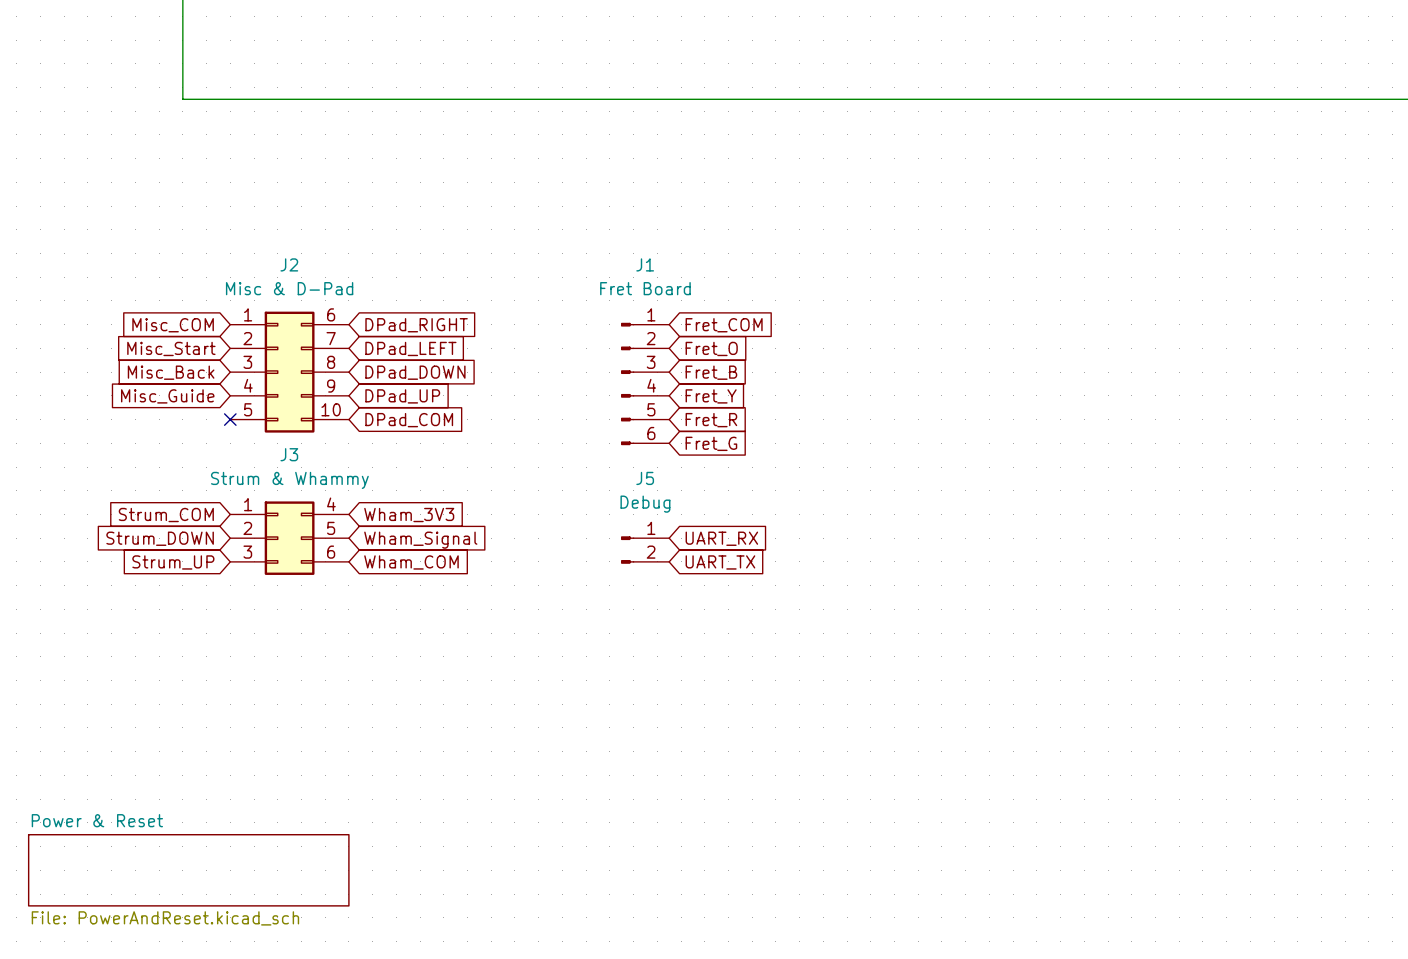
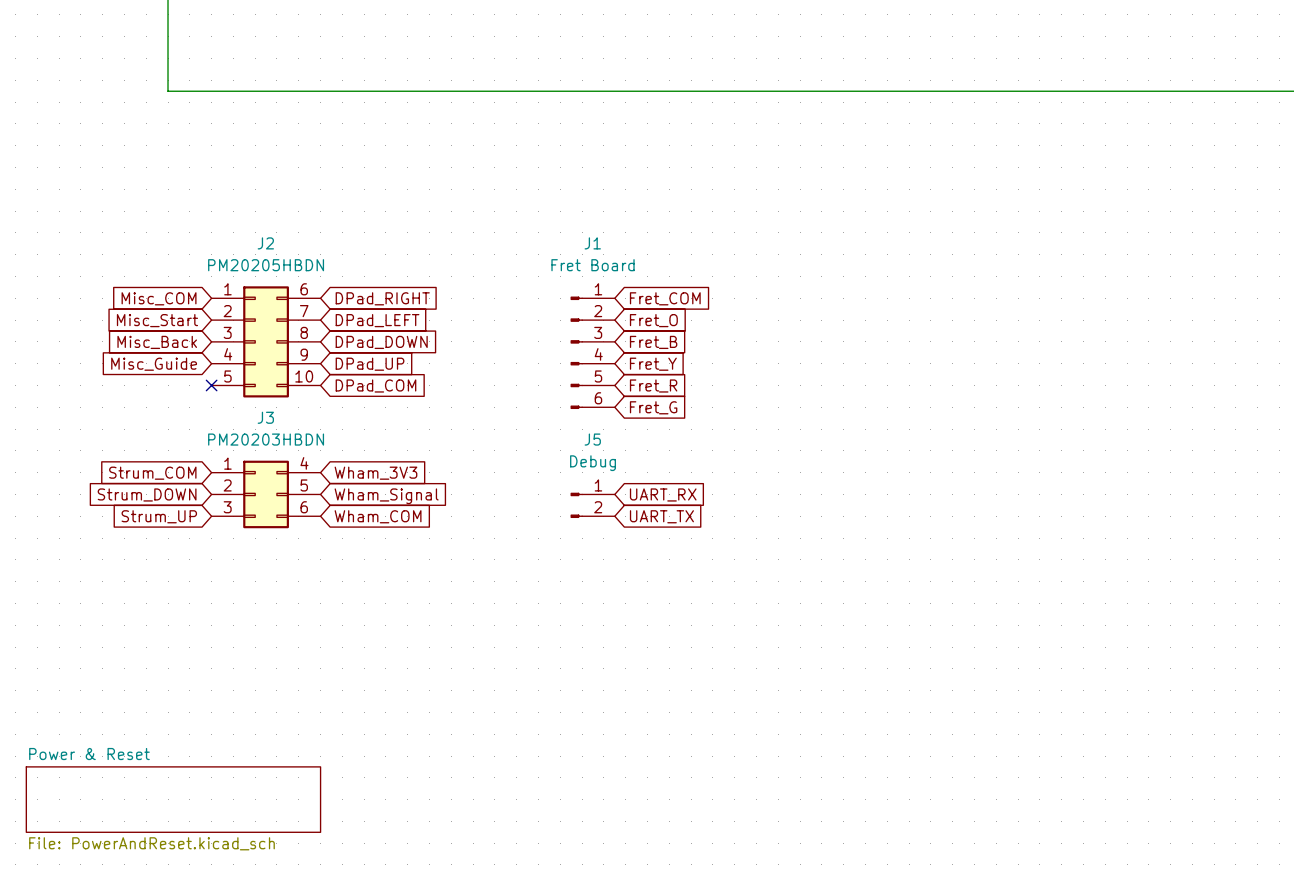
J2 value: Misc & D-Pad (289, 288) -> PM20205HBDN (266, 265)
J3 value: Strum & Whammy (289, 480) -> PM20203HBDN (266, 439)

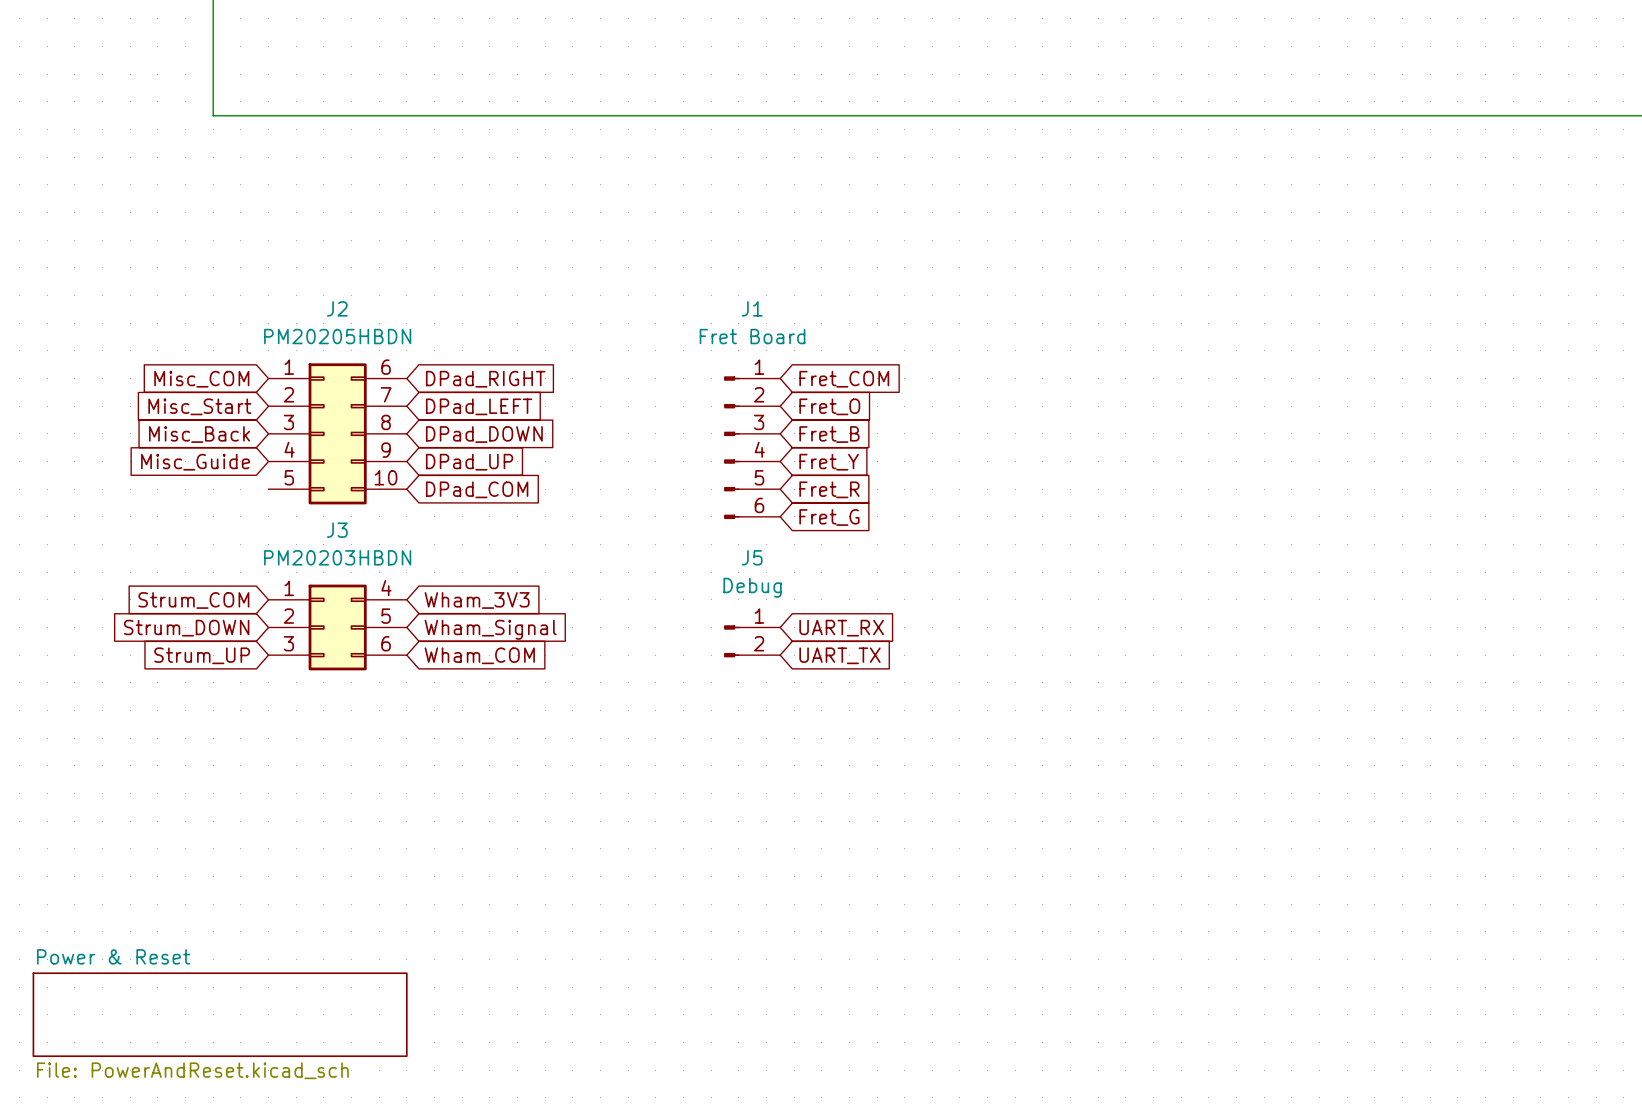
no-connect mark: (211, 385) -> none

